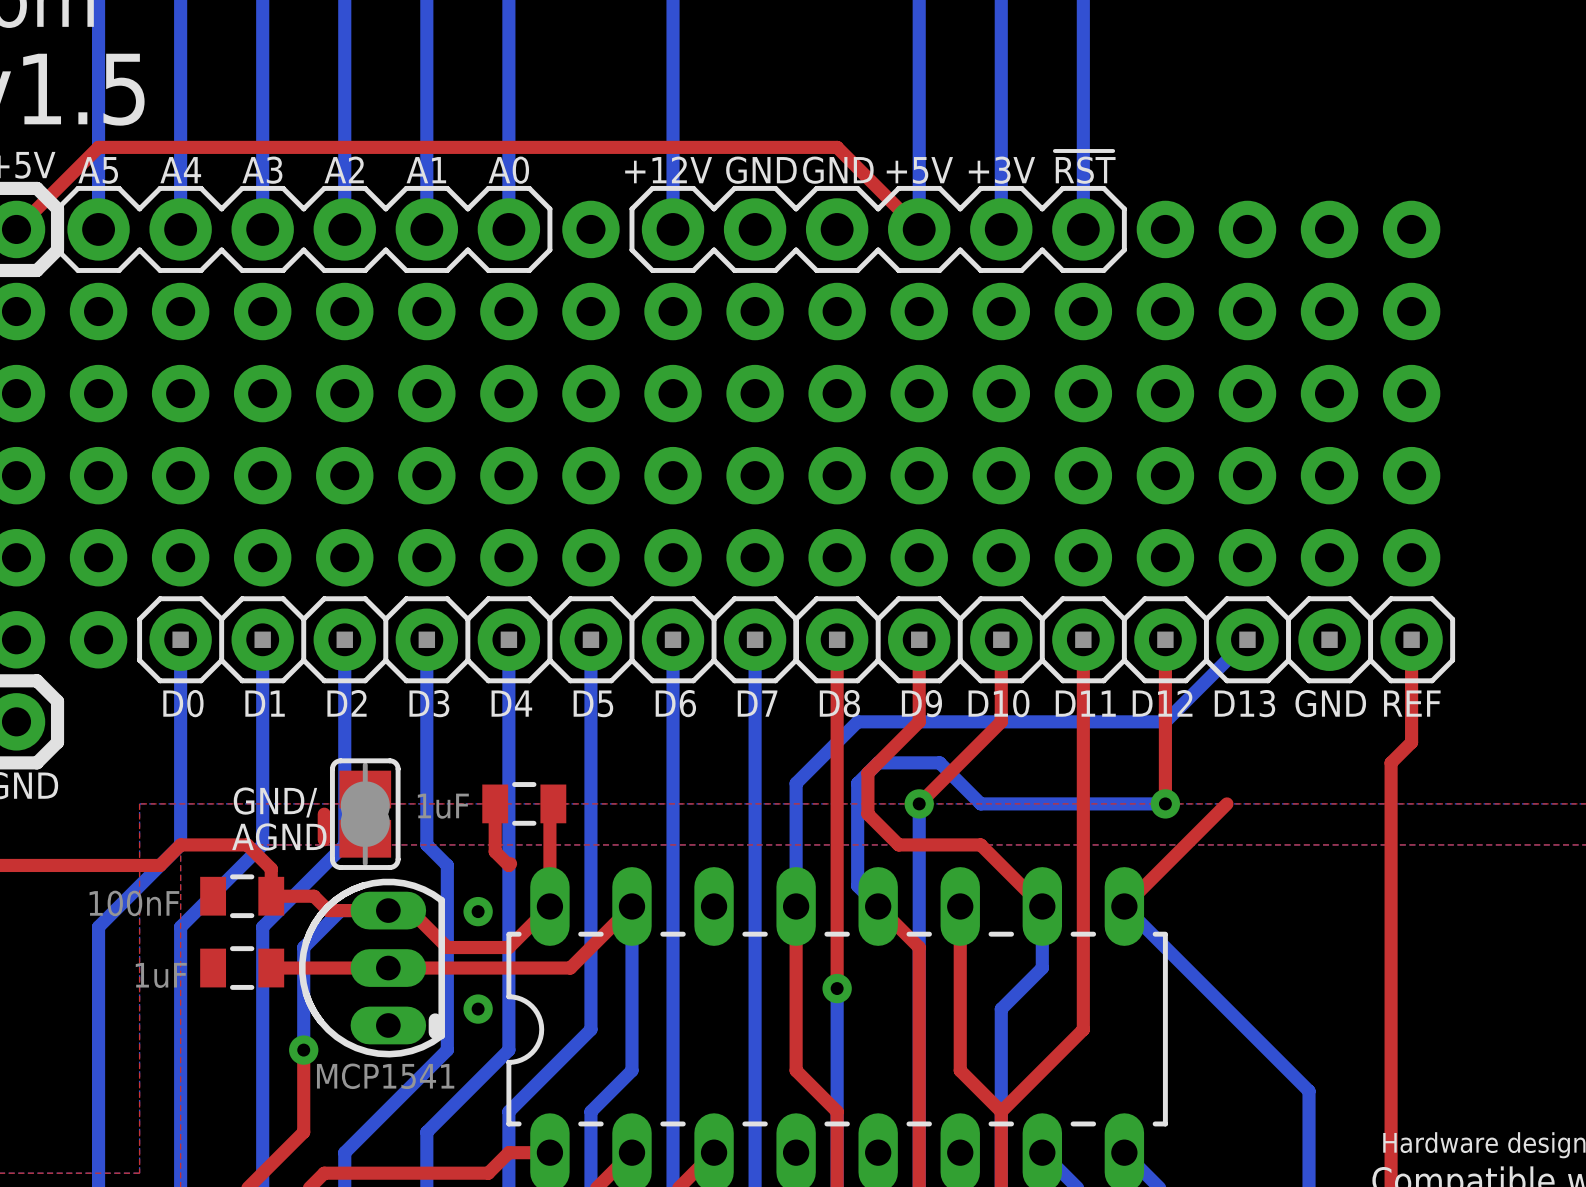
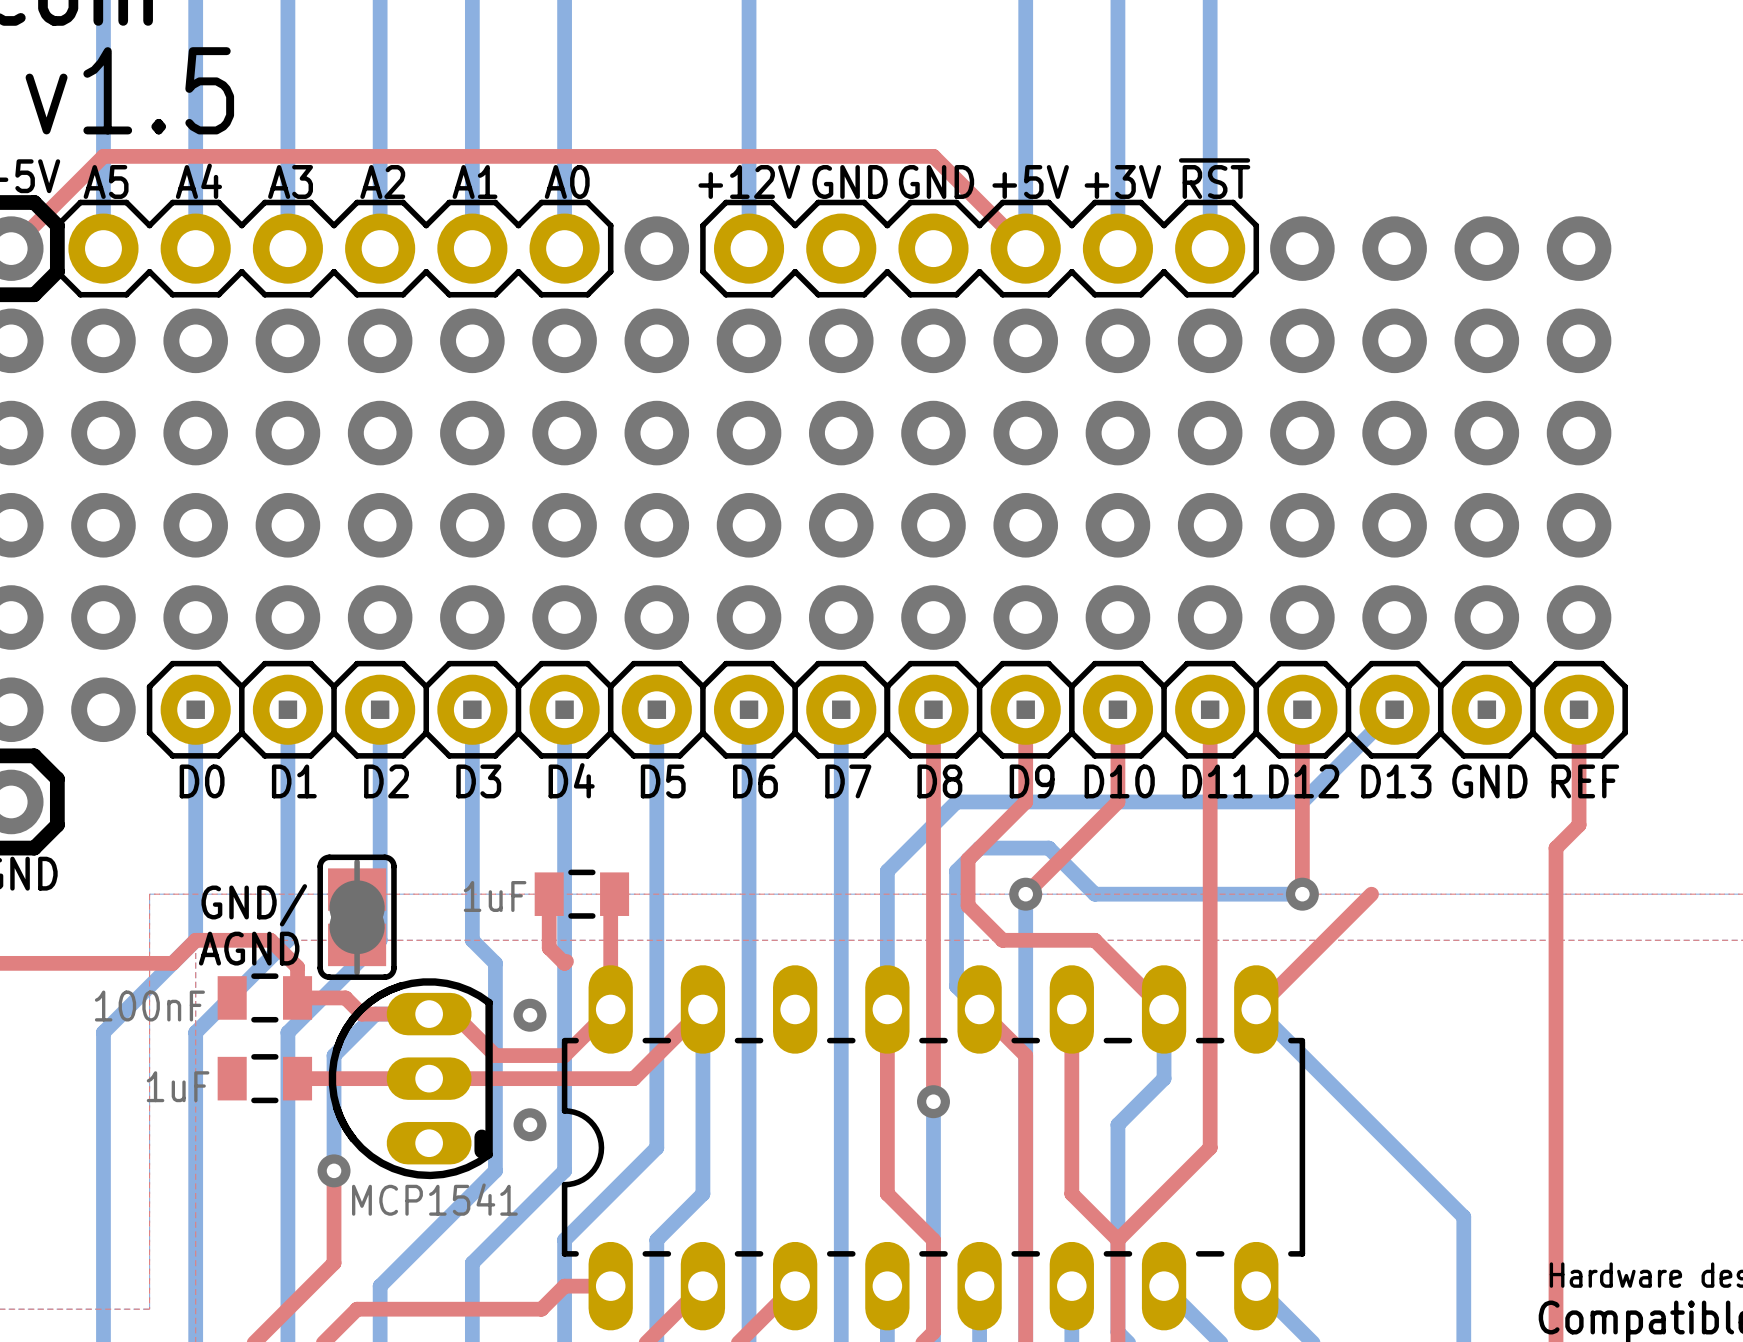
text position: GND/ (275, 802) -> GND/ (254, 905)
part position: (365, 814) -> (357, 917)
text position: AGND (279, 836) -> AGND (249, 948)

